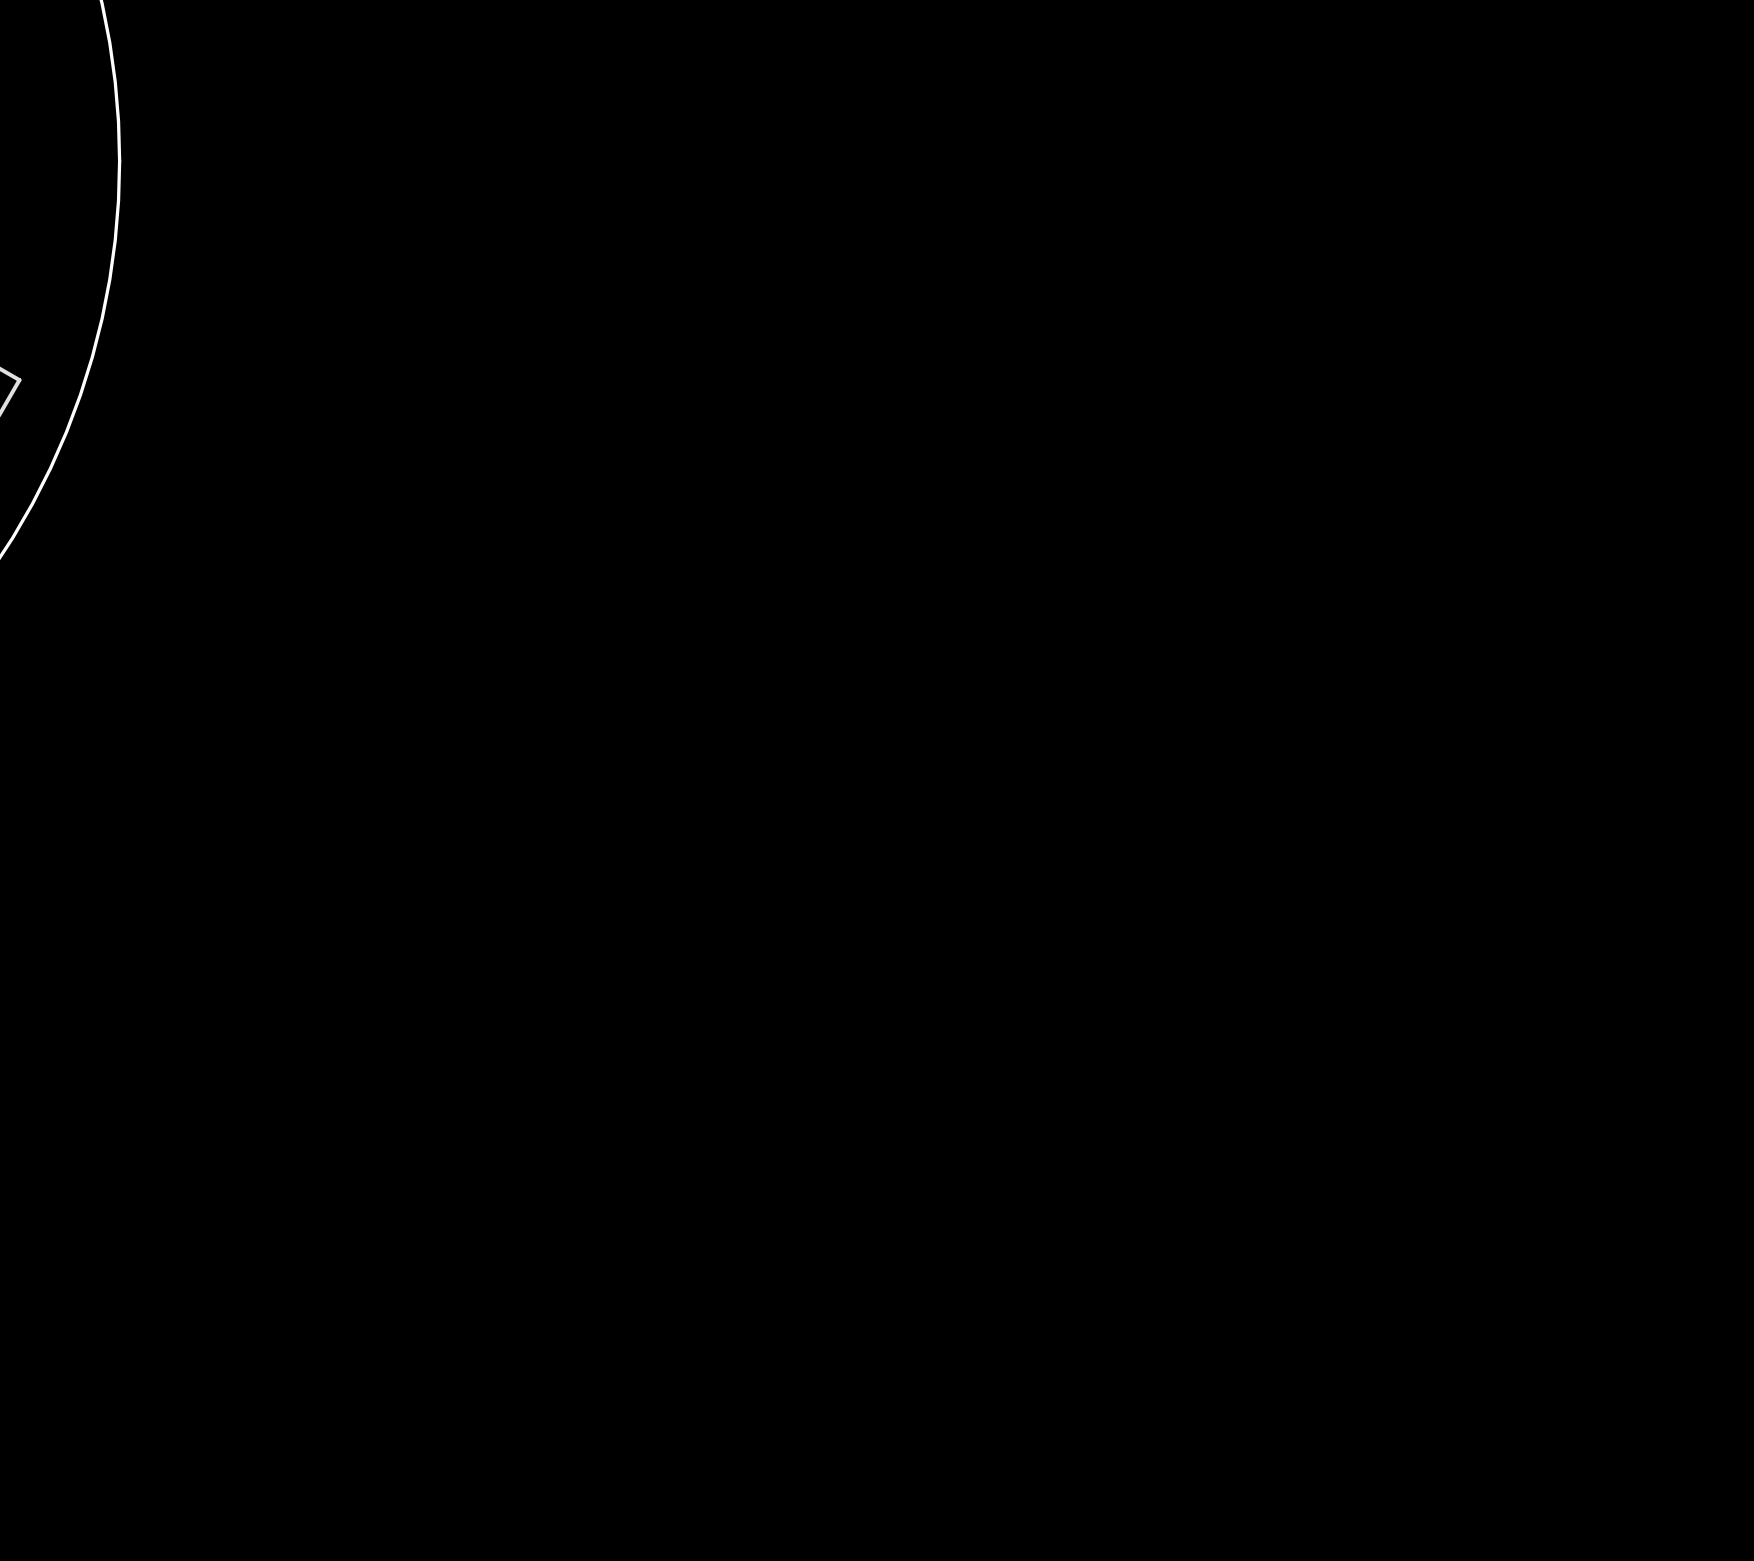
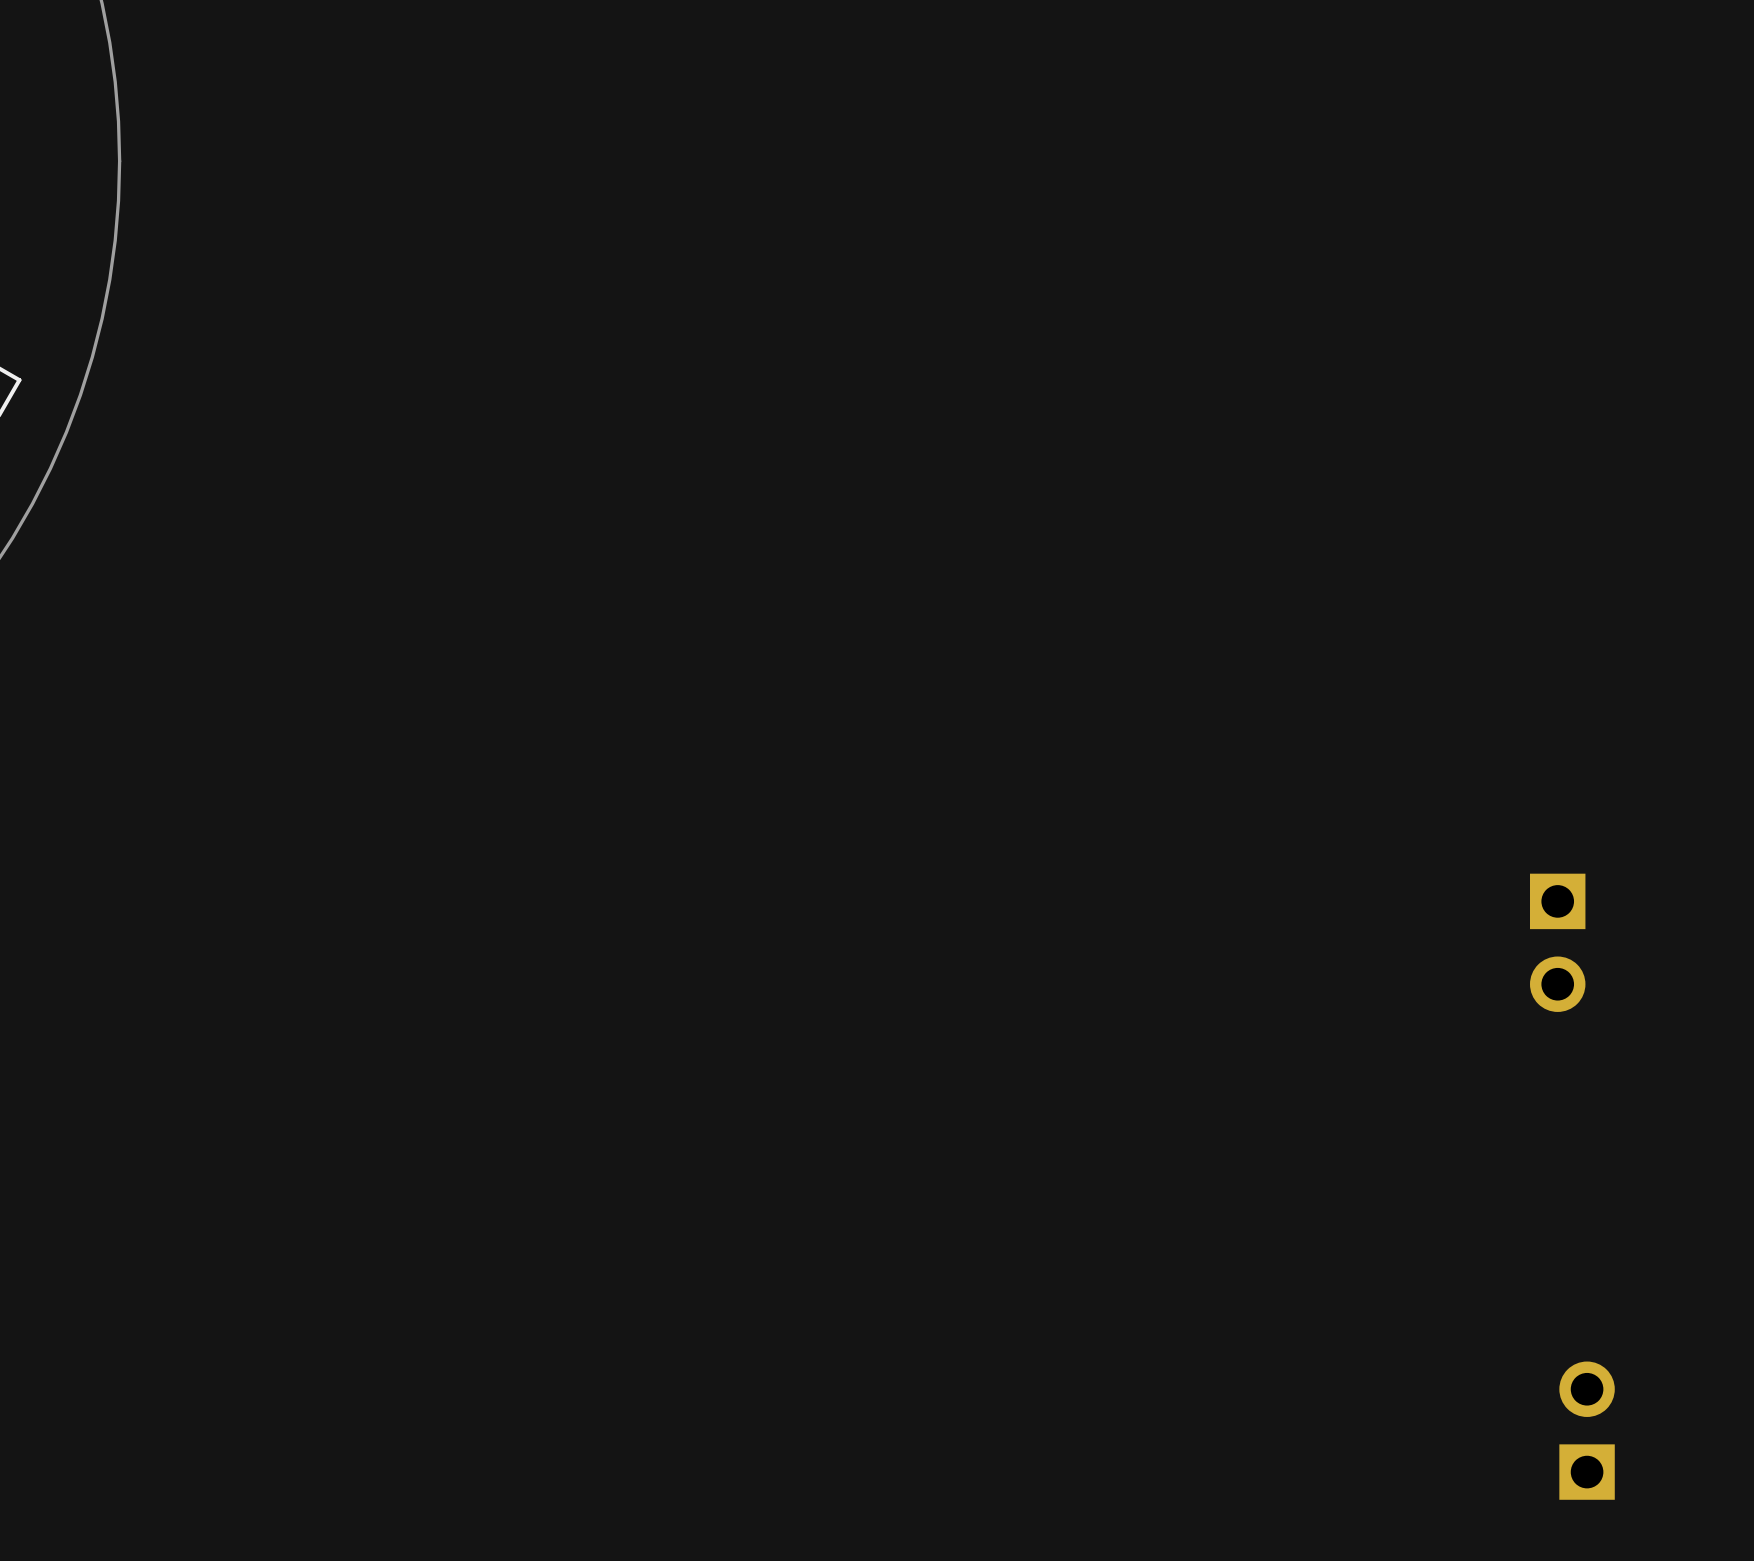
part: none -> (1557, 942)
part: none -> (1587, 1430)

